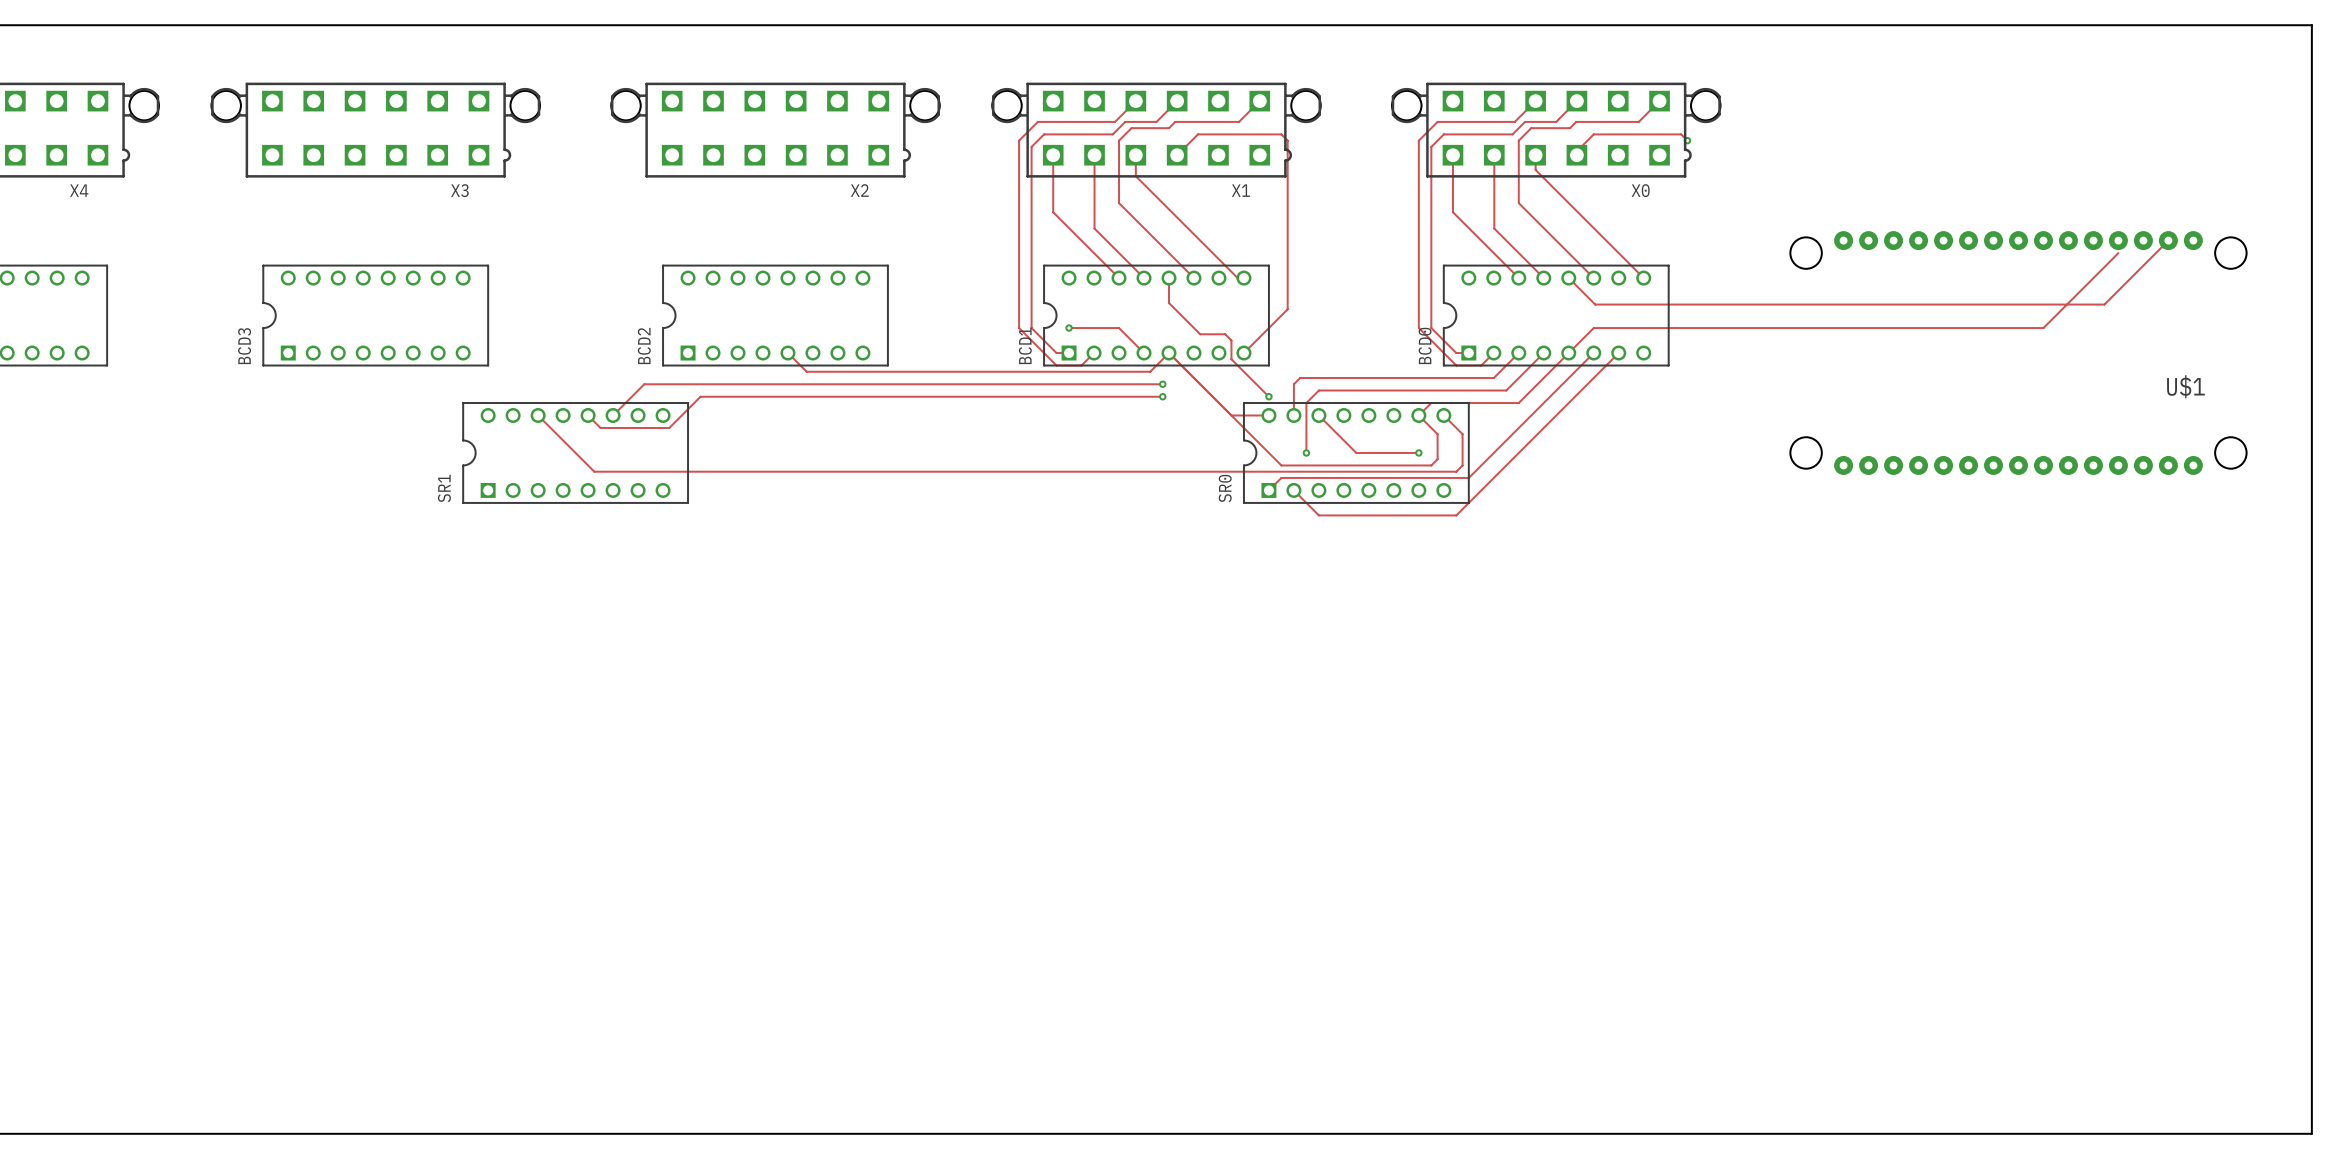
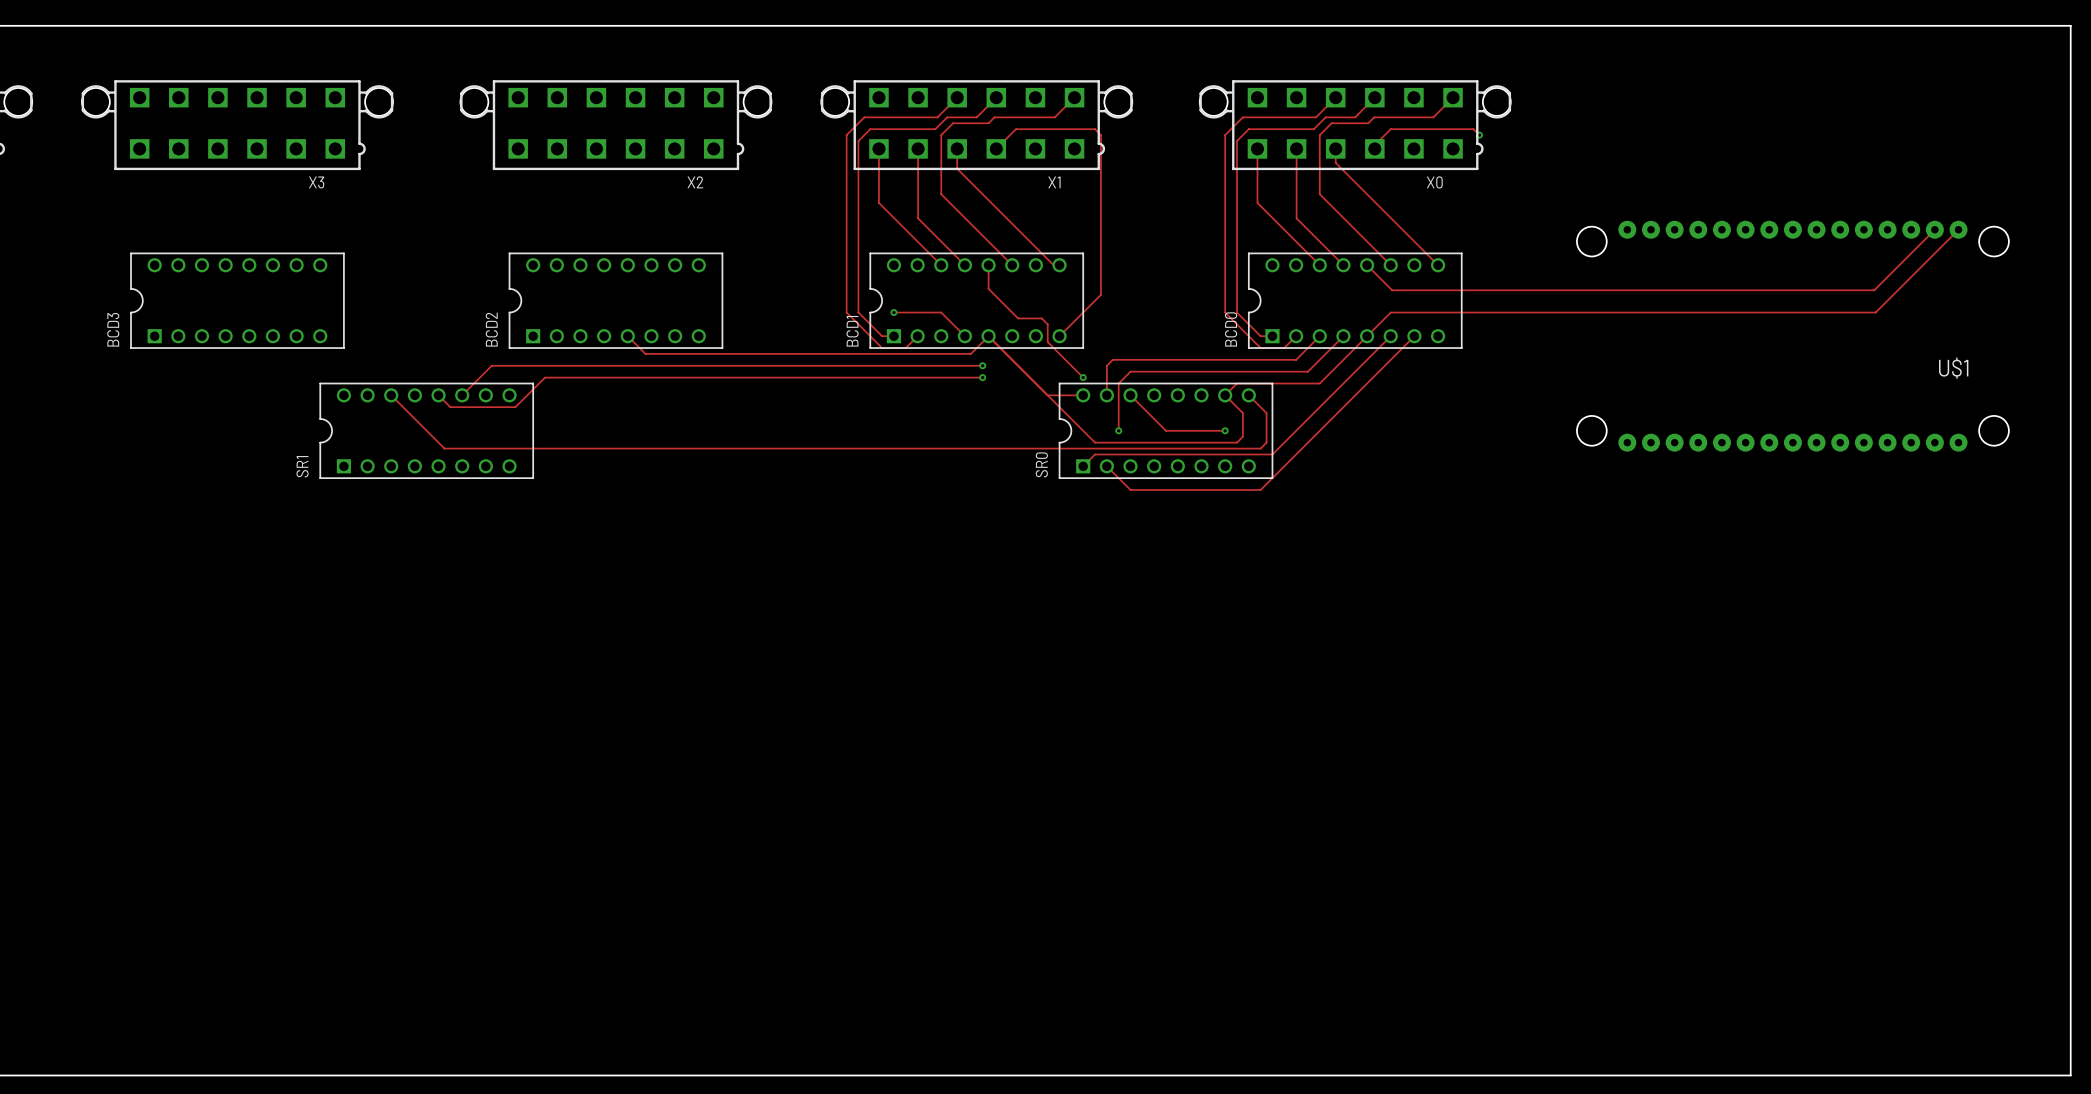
track: (2118, 253) (2043, 328) -> (1958, 229) (1875, 312) (1816, 312)

